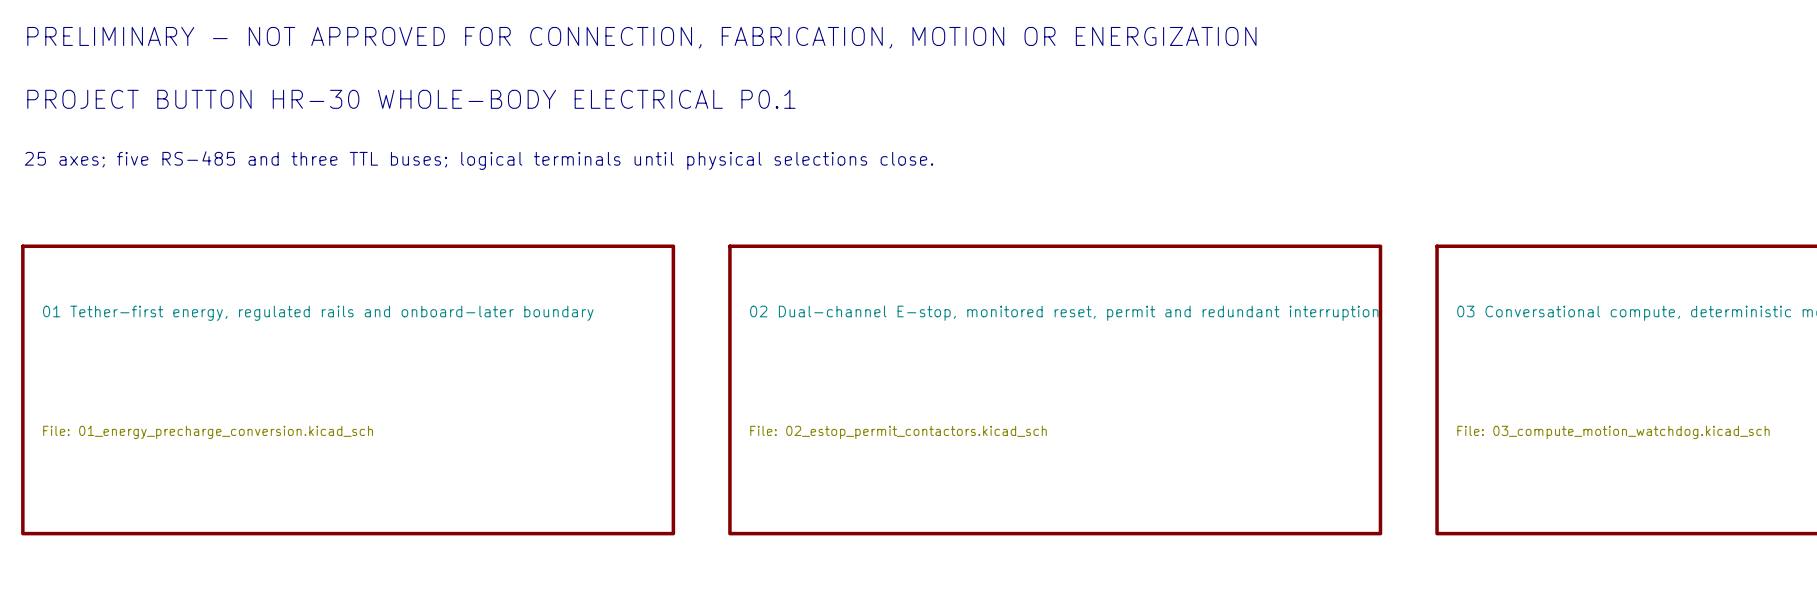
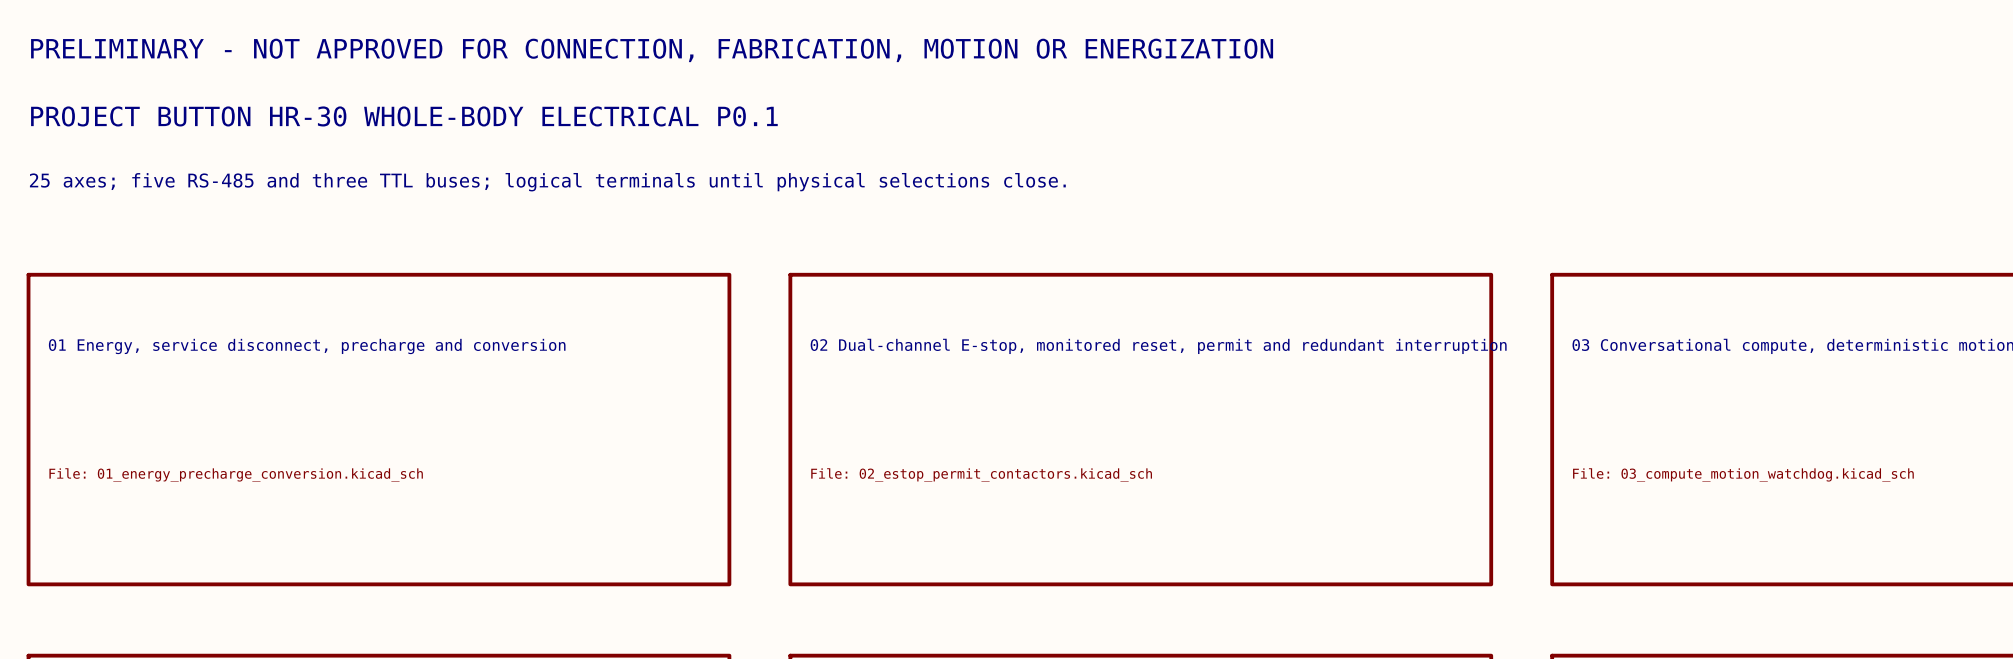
sheet 01 Tether-first energy, regulated rails and onboard-later boundary name: 01 Tether-first energy, regulated rails and onboard-later boundary (318, 313) -> 01 Energy, service disconnect, precharge and conversion (307, 346)

